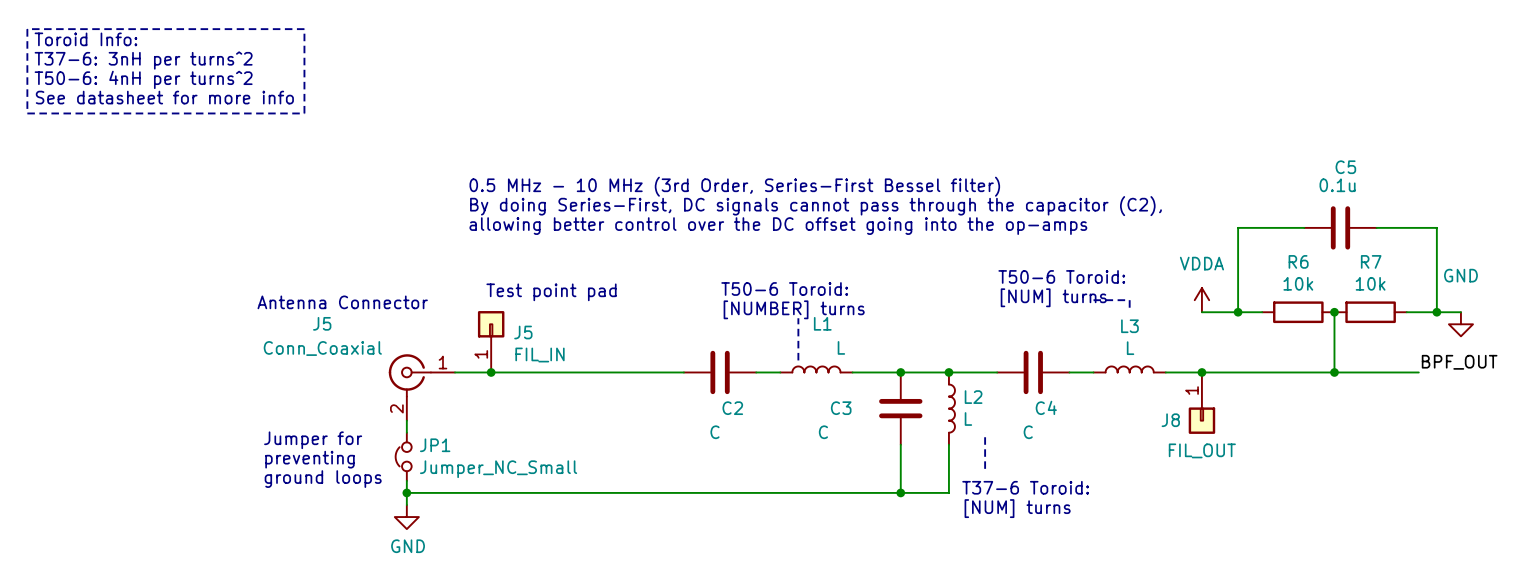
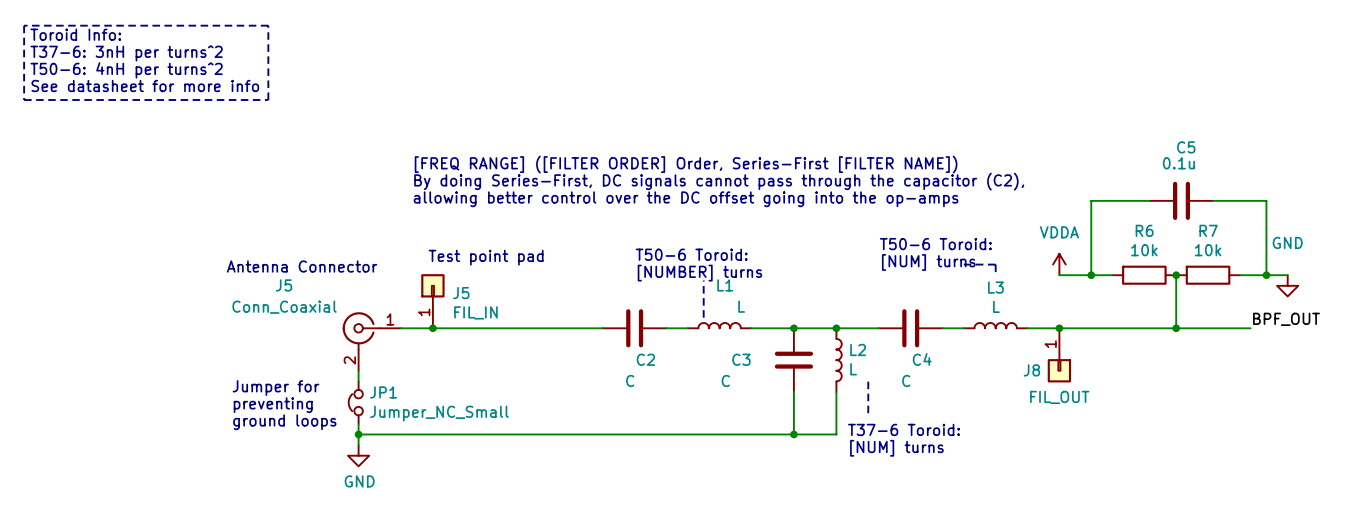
text: 0.5 MHz - 10 MHz (3rd Order, Series-First Bessel filter) (734, 186) -> [FREQ RANGE] ([FILTER ORDER] Order, Series-First [FILTER NAME]) (686, 164)

